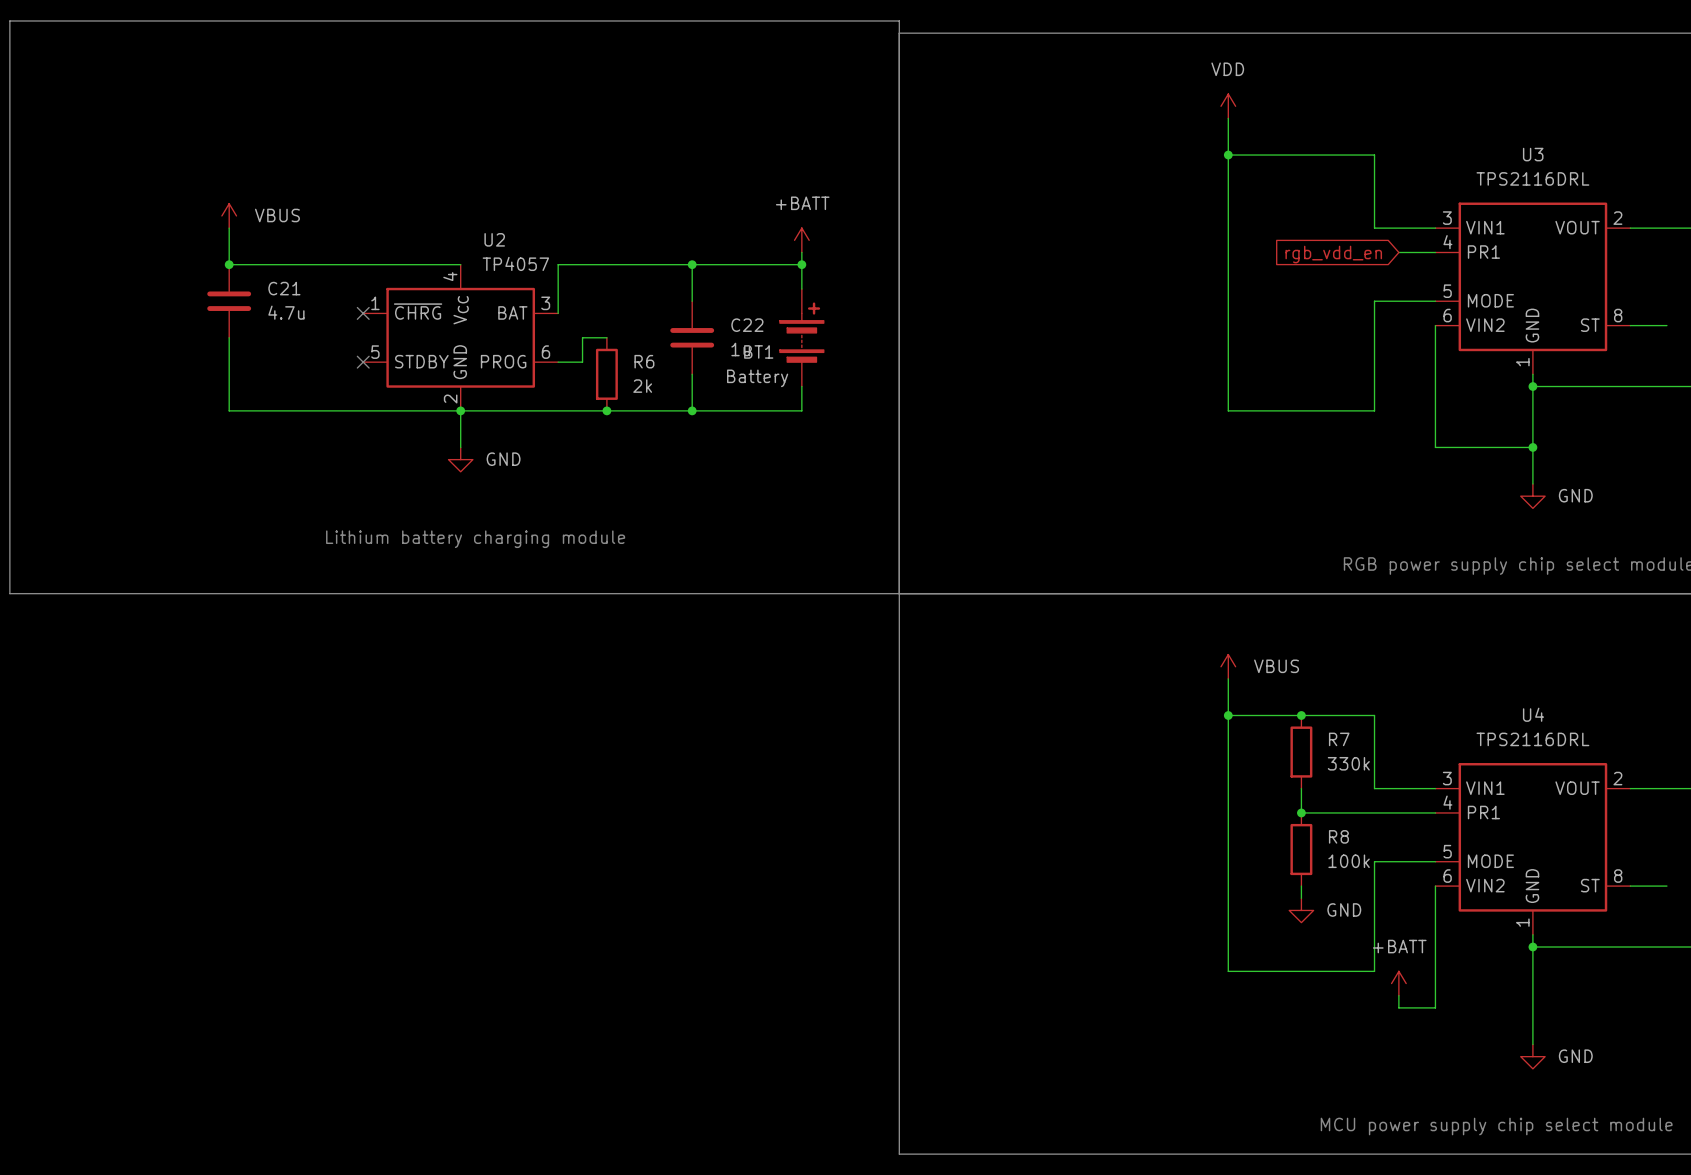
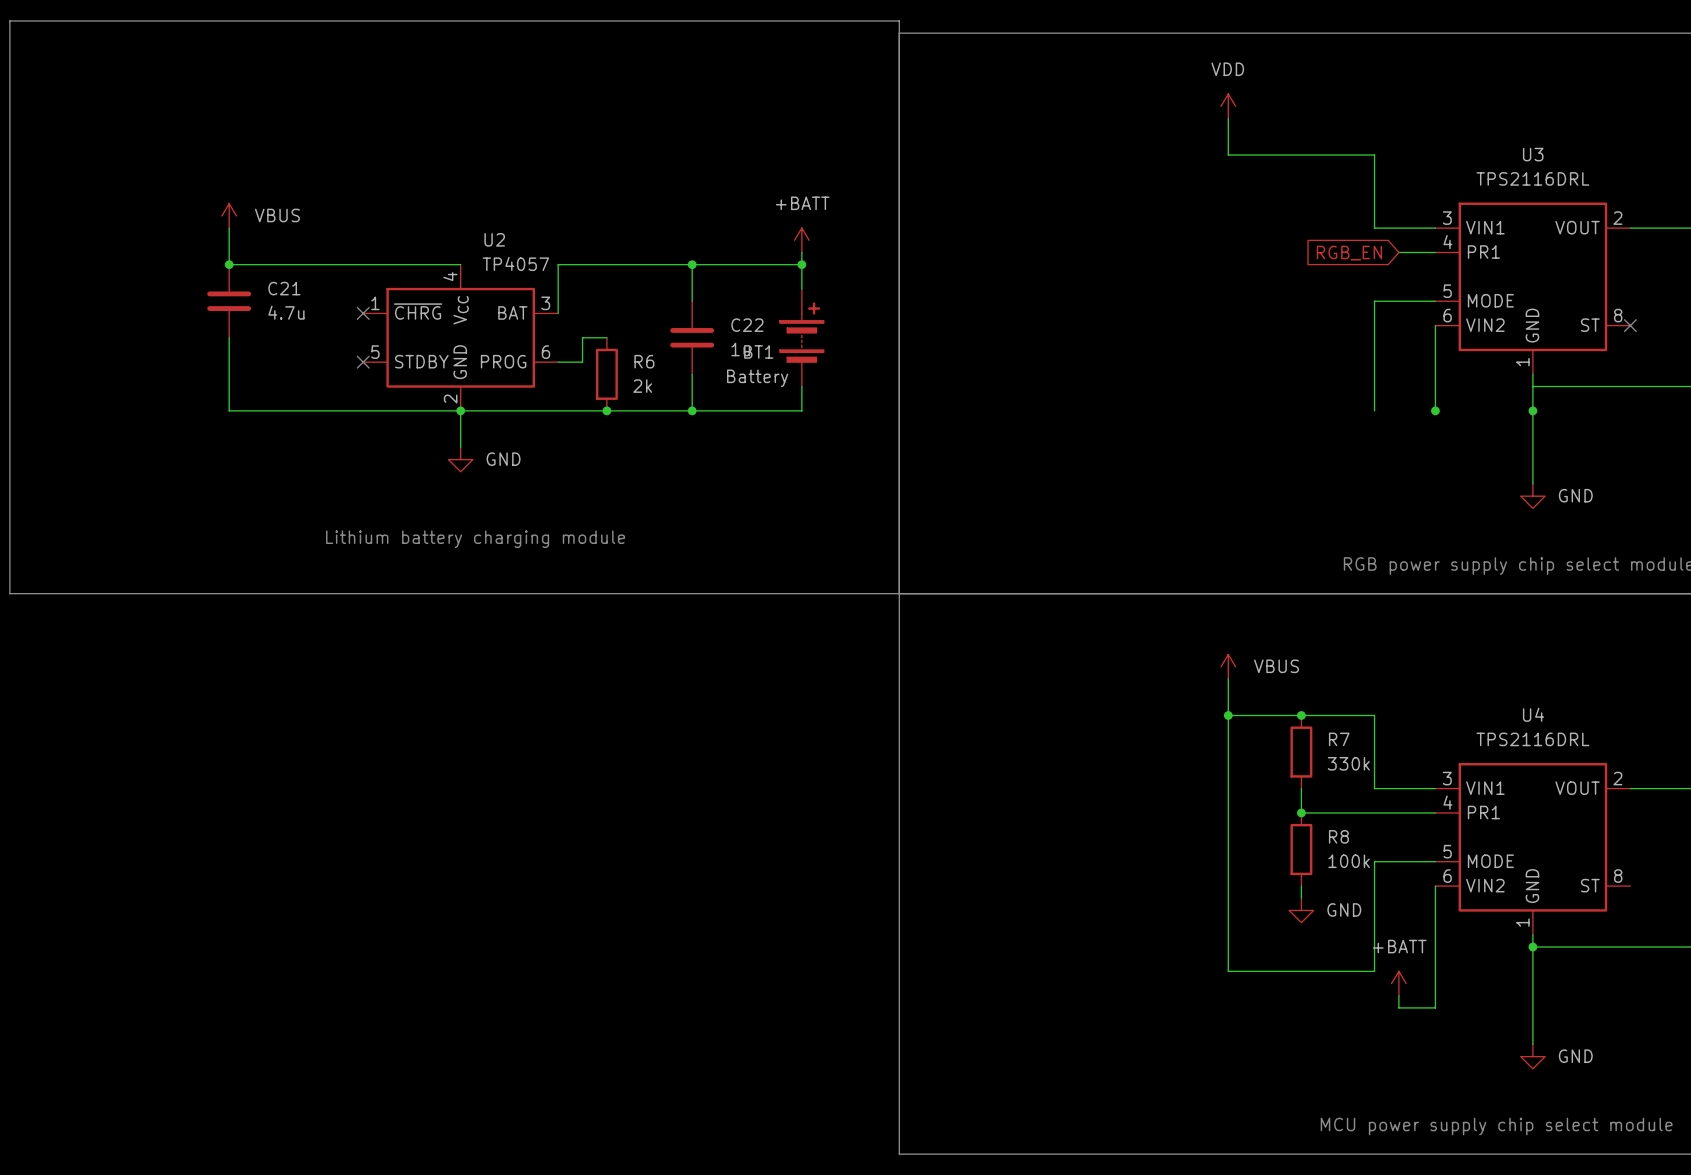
wire: (1228, 155) (1228, 410) (1374, 410) -> none
junction: (1228, 155) -> none
global label: rgb_vdd_en (1333, 254) -> RGB_EN (1349, 253)
wire: (1630, 325) (1666, 325) -> none
no-connect mark: none -> (1630, 325)
junction: (1532, 386) -> none
wire: (1435, 410) (1435, 447) (1532, 447) -> none
junction: none -> (1435, 410)
junction: none -> (1532, 410)
junction: (1532, 447) -> none
wire: (1630, 886) (1666, 886) -> none

